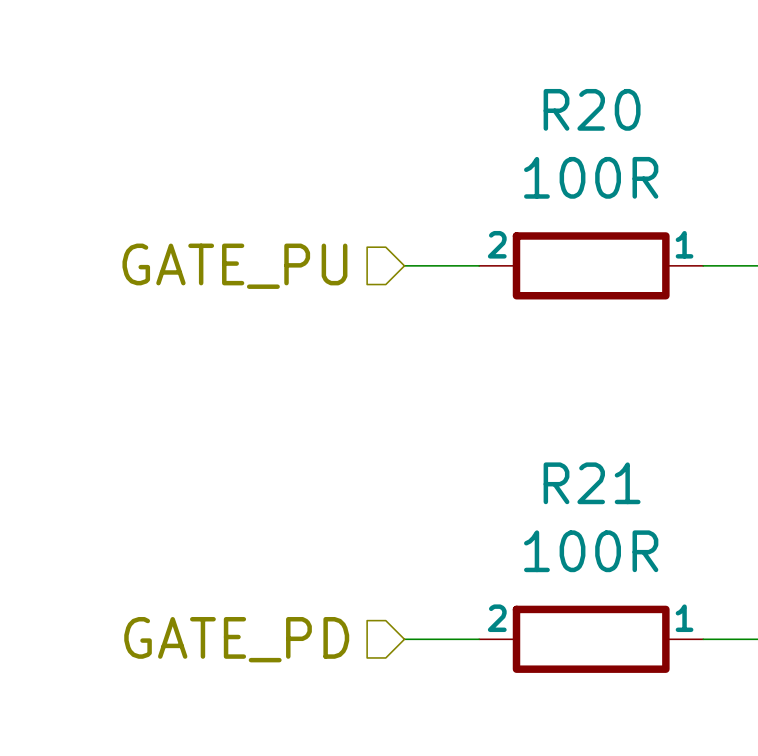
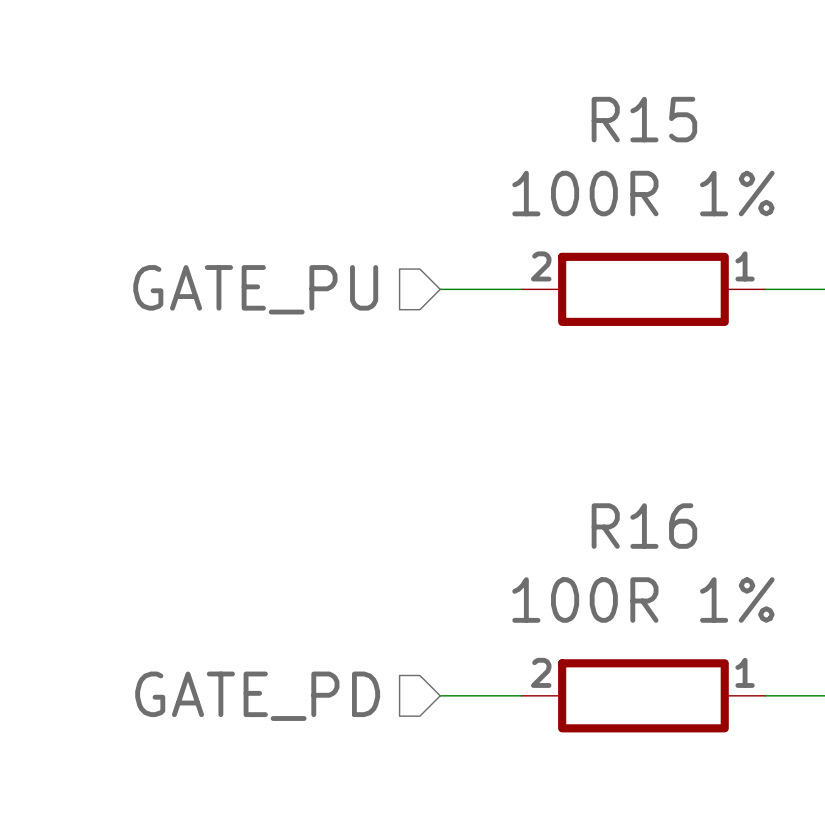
R20 name: R20 (592, 109) -> R15 (644, 119)
R20 value: 100R (591, 177) -> 100R 1% (643, 193)
R21 name: R21 (592, 483) -> R16 (644, 526)
R21 value: 100R (591, 551) -> 100R 1% (643, 600)

